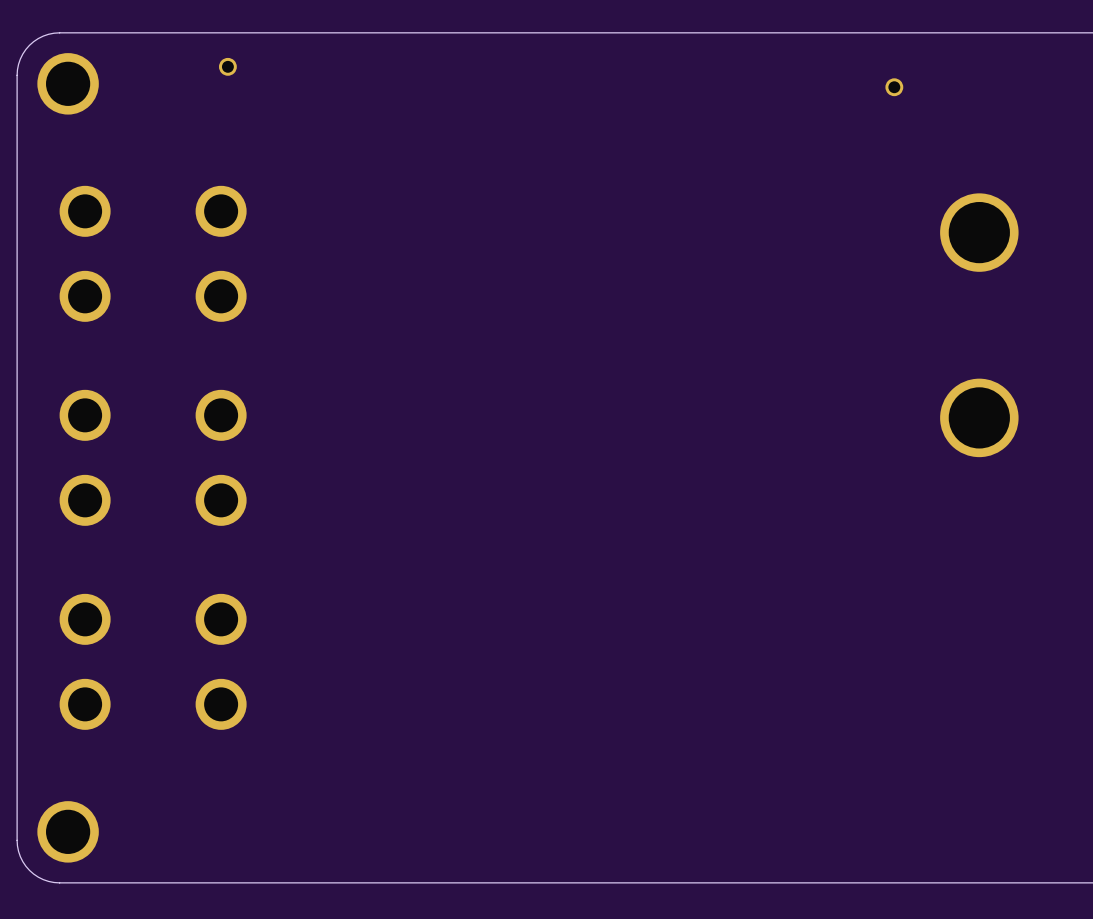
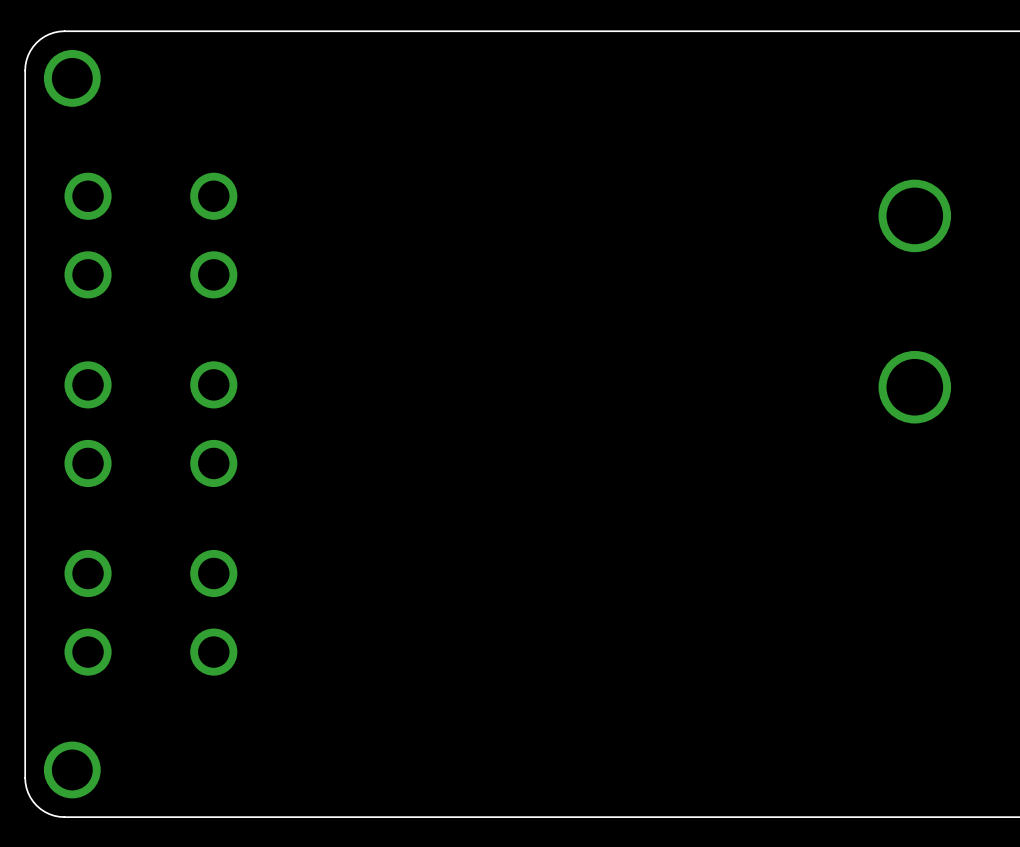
part: (227, 66) -> none
part: (894, 87) -> none

